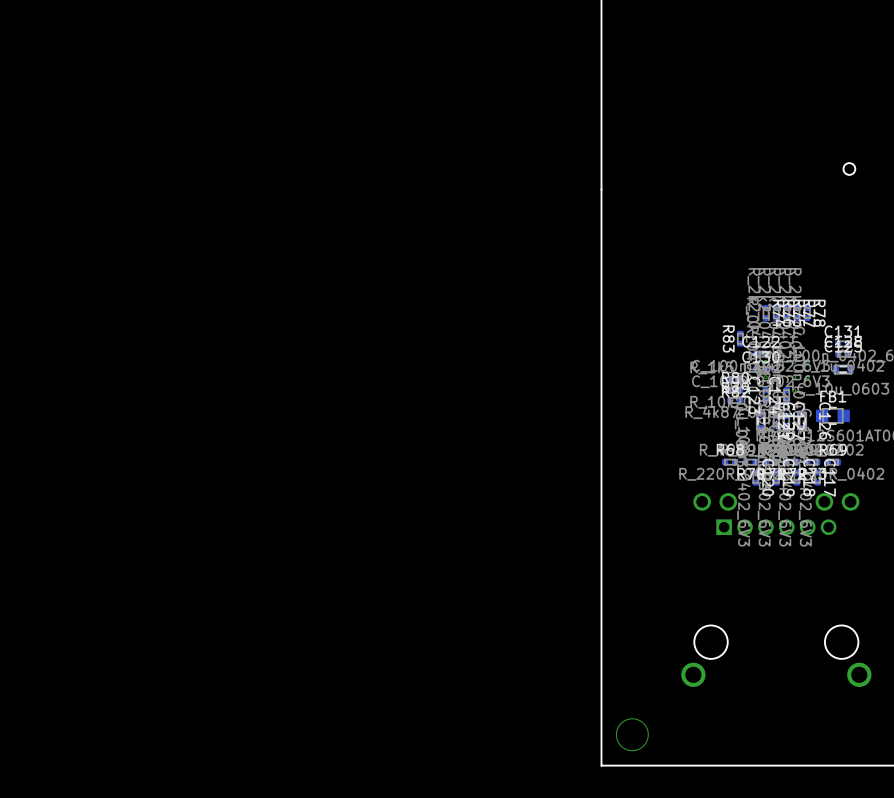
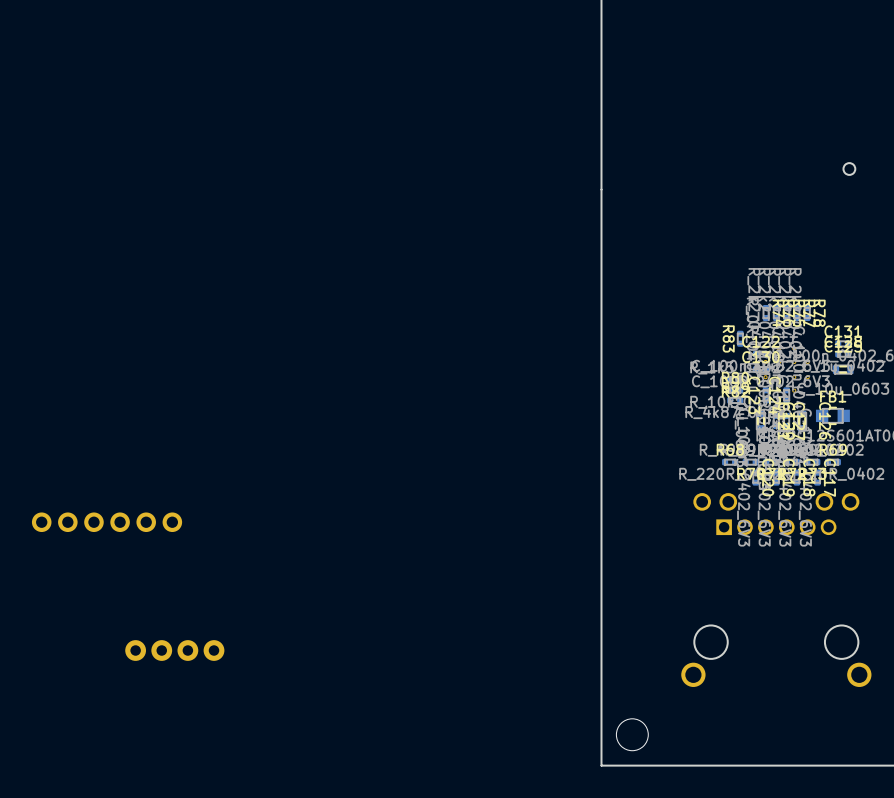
part: none -> (107, 522)
part: none -> (174, 650)

